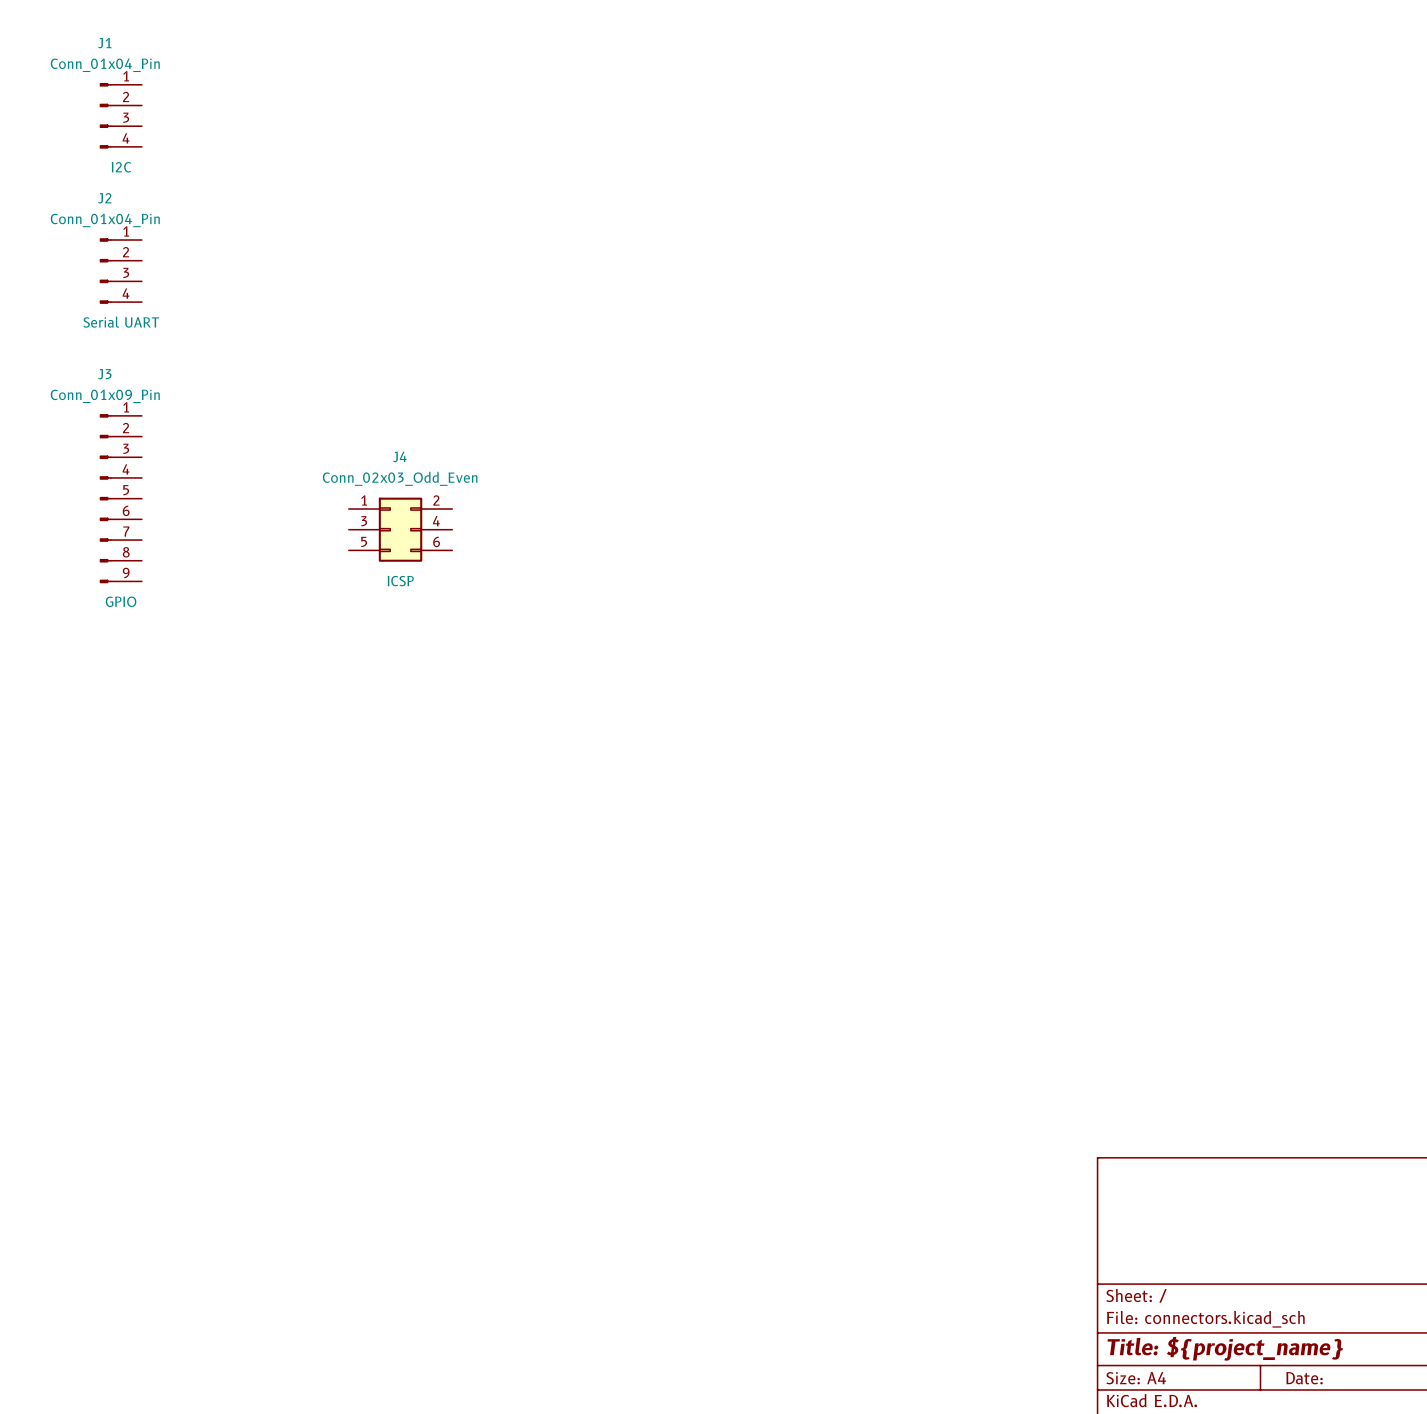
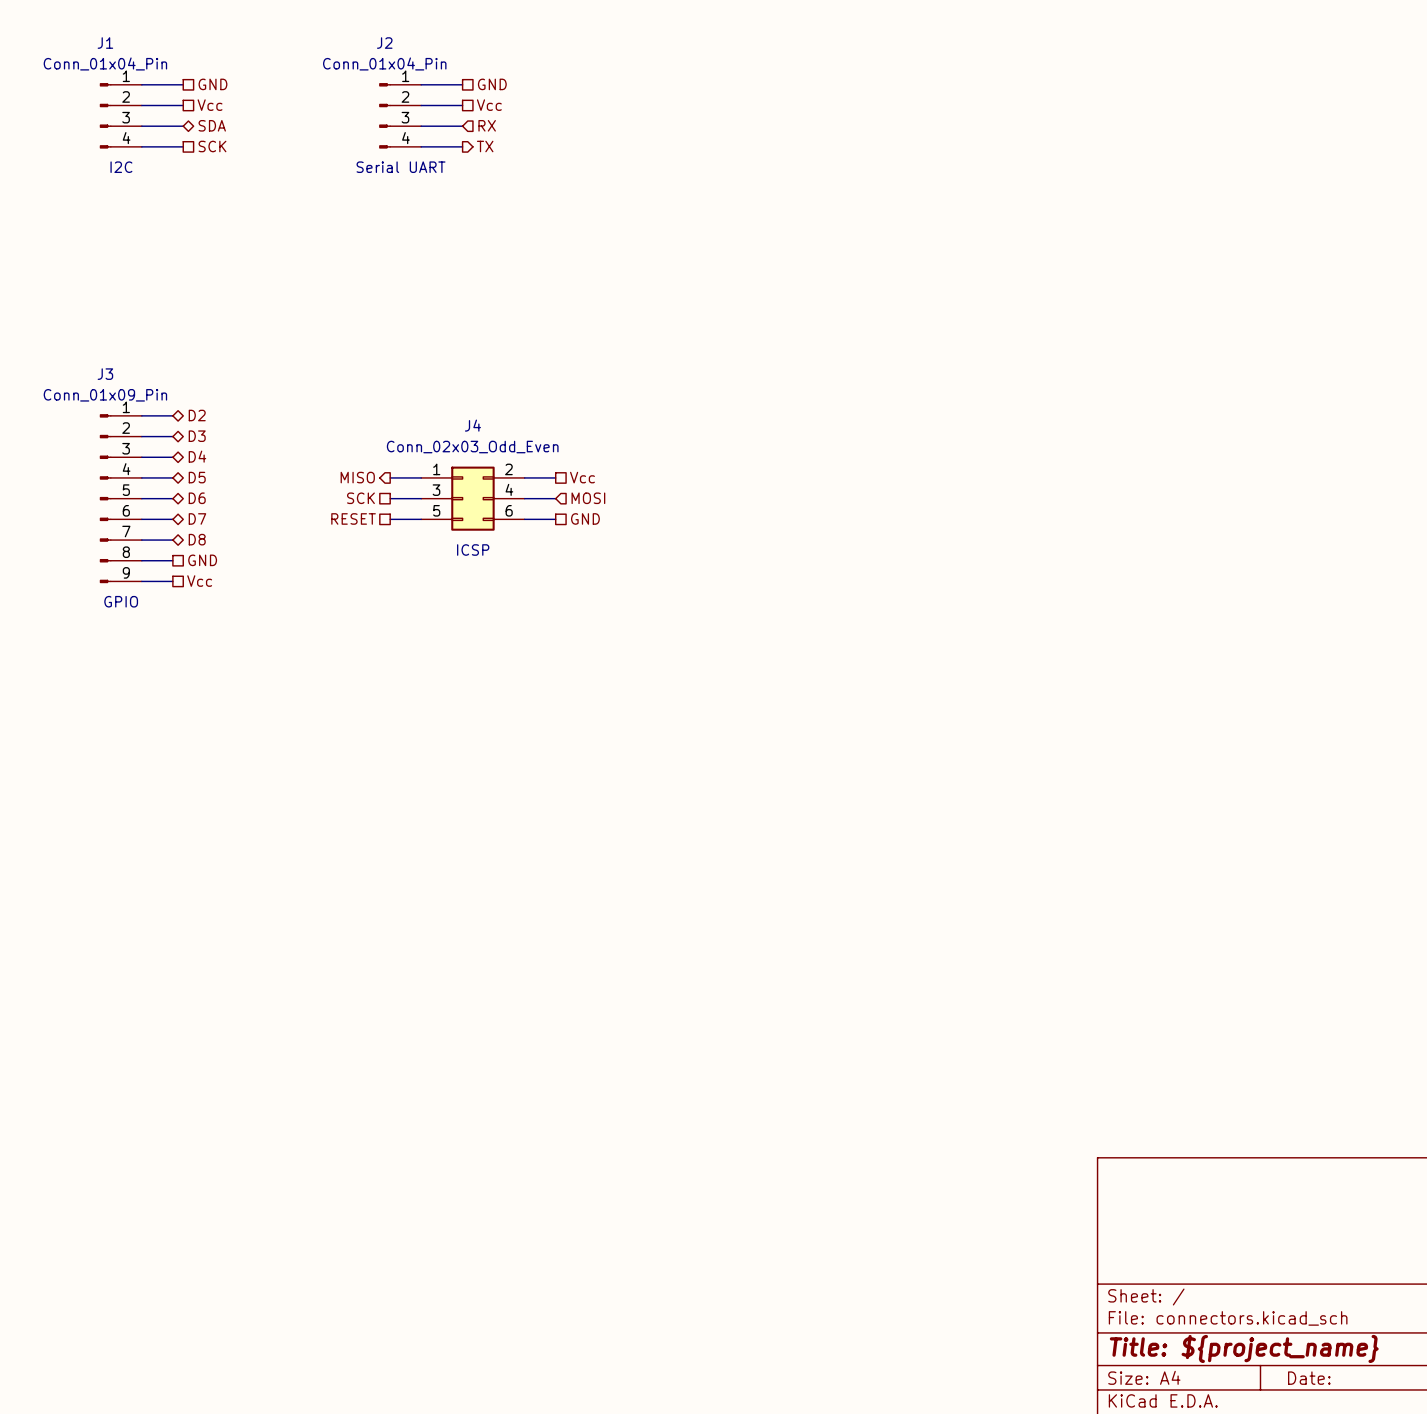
wire: none -> (141, 84) (183, 84)
hierarchical label: none -> GND (212, 84)
wire: none -> (421, 84) (462, 84)
hierarchical label: none -> GND (492, 84)
wire: none -> (141, 105) (183, 105)
hierarchical label: none -> Vcc (210, 105)
wire: none -> (421, 105) (462, 105)
hierarchical label: none -> Vcc (489, 105)
hierarchical label: none -> SDA (212, 125)
hierarchical label: none -> RX (487, 125)
wire: none -> (141, 126) (183, 126)
wire: none -> (421, 126) (462, 126)
wire: none -> (141, 146) (183, 146)
hierarchical label: none -> SCK (212, 146)
wire: none -> (421, 146) (462, 146)
hierarchical label: none -> TX (485, 146)
J2 position: (120, 271) -> (400, 115)
wire: none -> (141, 415) (172, 415)
hierarchical label: none -> D2 (197, 415)
wire: none -> (141, 436) (172, 436)
hierarchical label: none -> D3 (197, 436)
hierarchical label: none -> D4 (197, 456)
wire: none -> (141, 457) (172, 457)
wire: none -> (141, 477) (172, 477)
hierarchical label: none -> D5 (197, 477)
hierarchical label: none -> MISO (357, 477)
wire: none -> (390, 477) (421, 477)
wire: none -> (524, 477) (555, 477)
hierarchical label: none -> Vcc (582, 477)
wire: none -> (141, 498) (172, 498)
hierarchical label: none -> D6 (197, 498)
hierarchical label: none -> SCK (360, 498)
wire: none -> (524, 498) (555, 498)
hierarchical label: none -> MOSI (588, 498)
hierarchical label: none -> D7 (197, 518)
wire: none -> (141, 519) (172, 519)
hierarchical label: none -> RESET (353, 518)
wire: none -> (524, 519) (555, 519)
hierarchical label: none -> GND (585, 518)
J4 position: (400, 529) -> (472, 498)
hierarchical label: none -> D8 (197, 539)
wire: none -> (141, 540) (172, 540)
wire: none -> (141, 560) (172, 560)
hierarchical label: none -> GND (202, 560)
wire: none -> (141, 581) (172, 581)
hierarchical label: none -> Vcc (199, 581)

